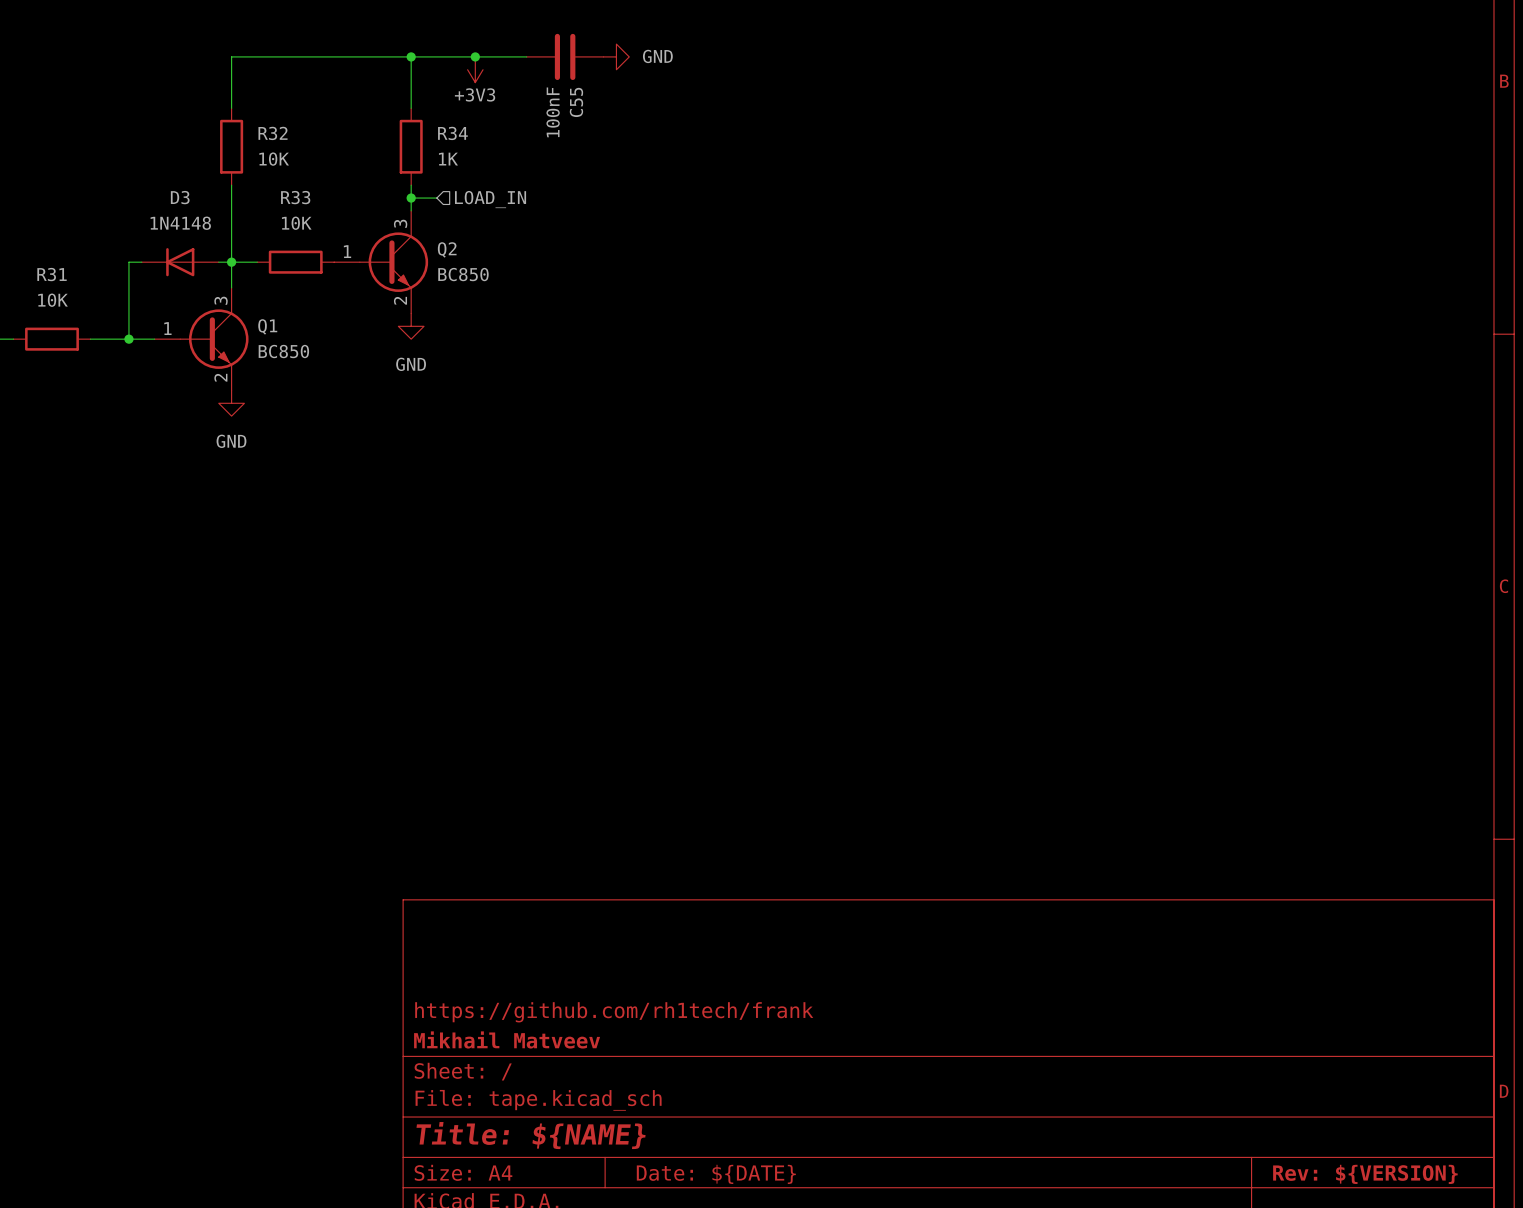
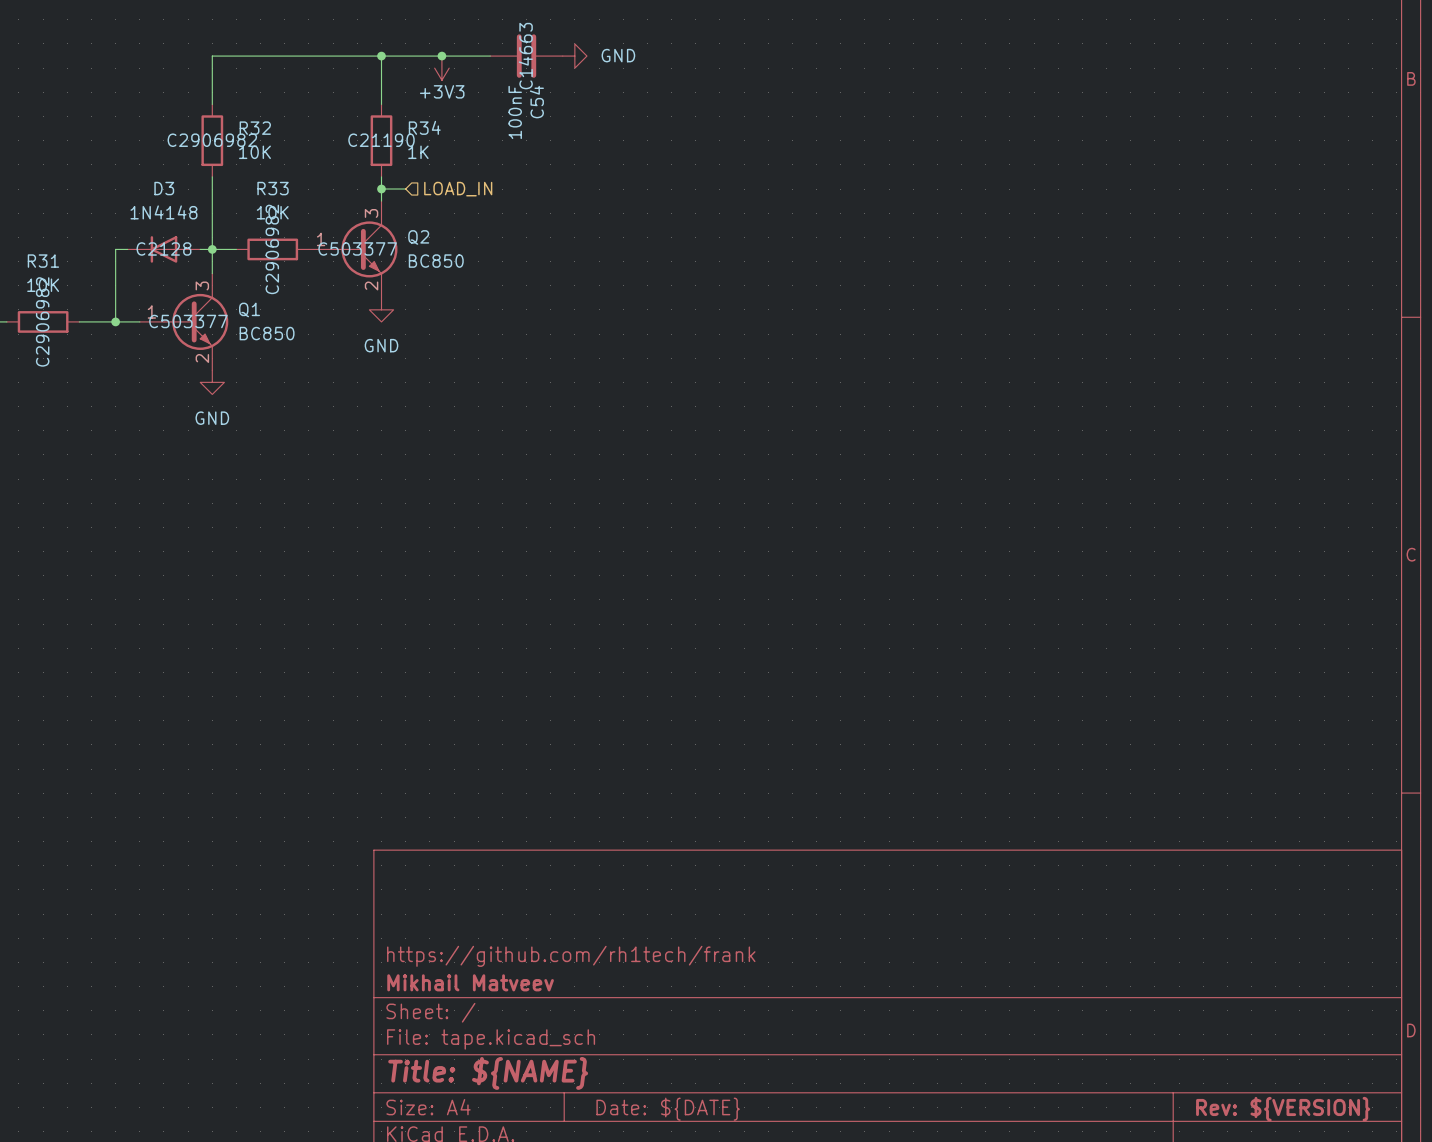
C55 text: none -> C14663 (525, 56)
C55 name: C55 (576, 102) -> C54 (536, 102)
R32 text: none -> C2906982 (212, 140)
R34 text: none -> C21190 (381, 140)
D3 text: none -> C2128 (163, 248)
Q2 text: none -> C503377 (357, 248)
R33 text: none -> C2906982 (272, 249)
Q1 text: none -> C503377 (188, 321)
R31 text: none -> C2906982 (42, 321)

